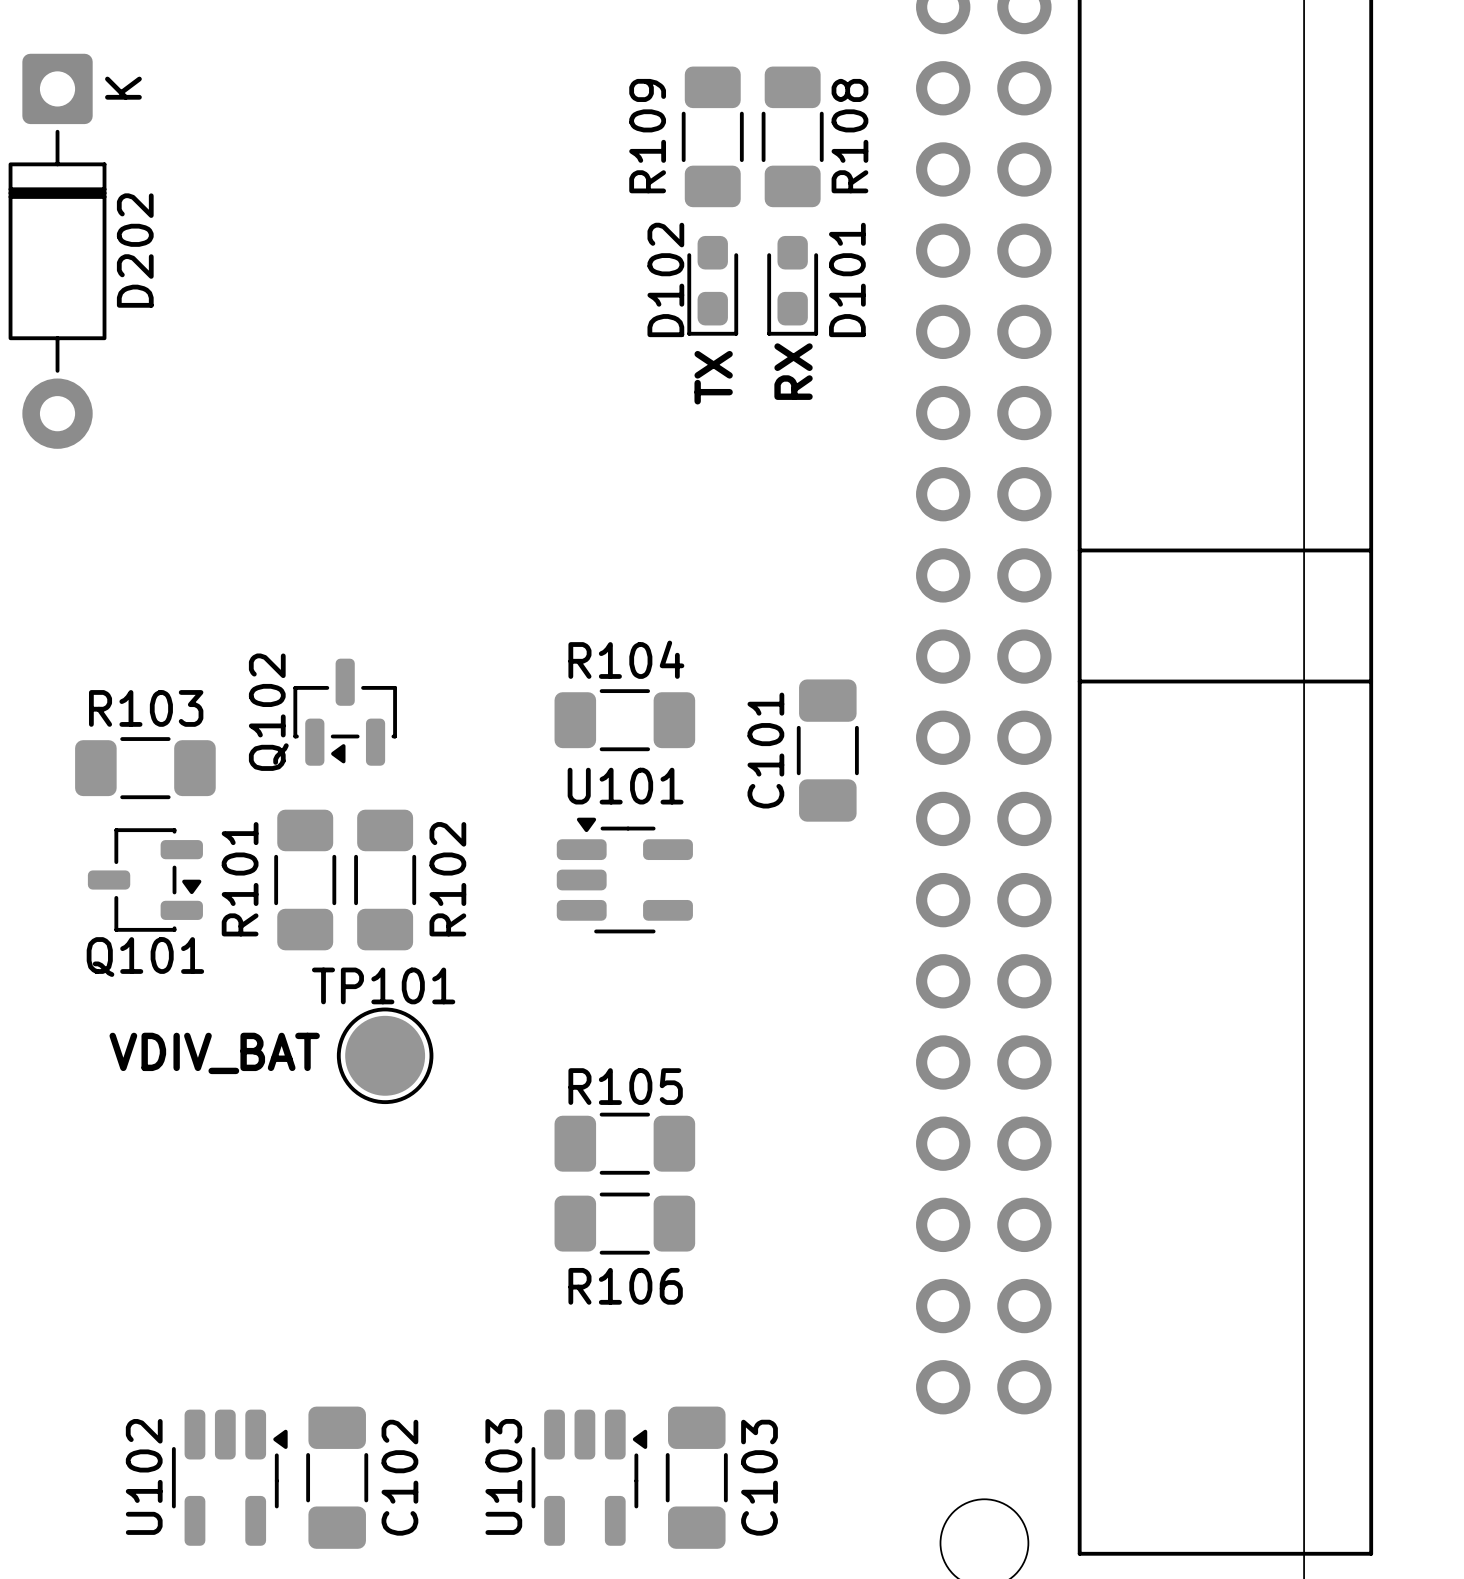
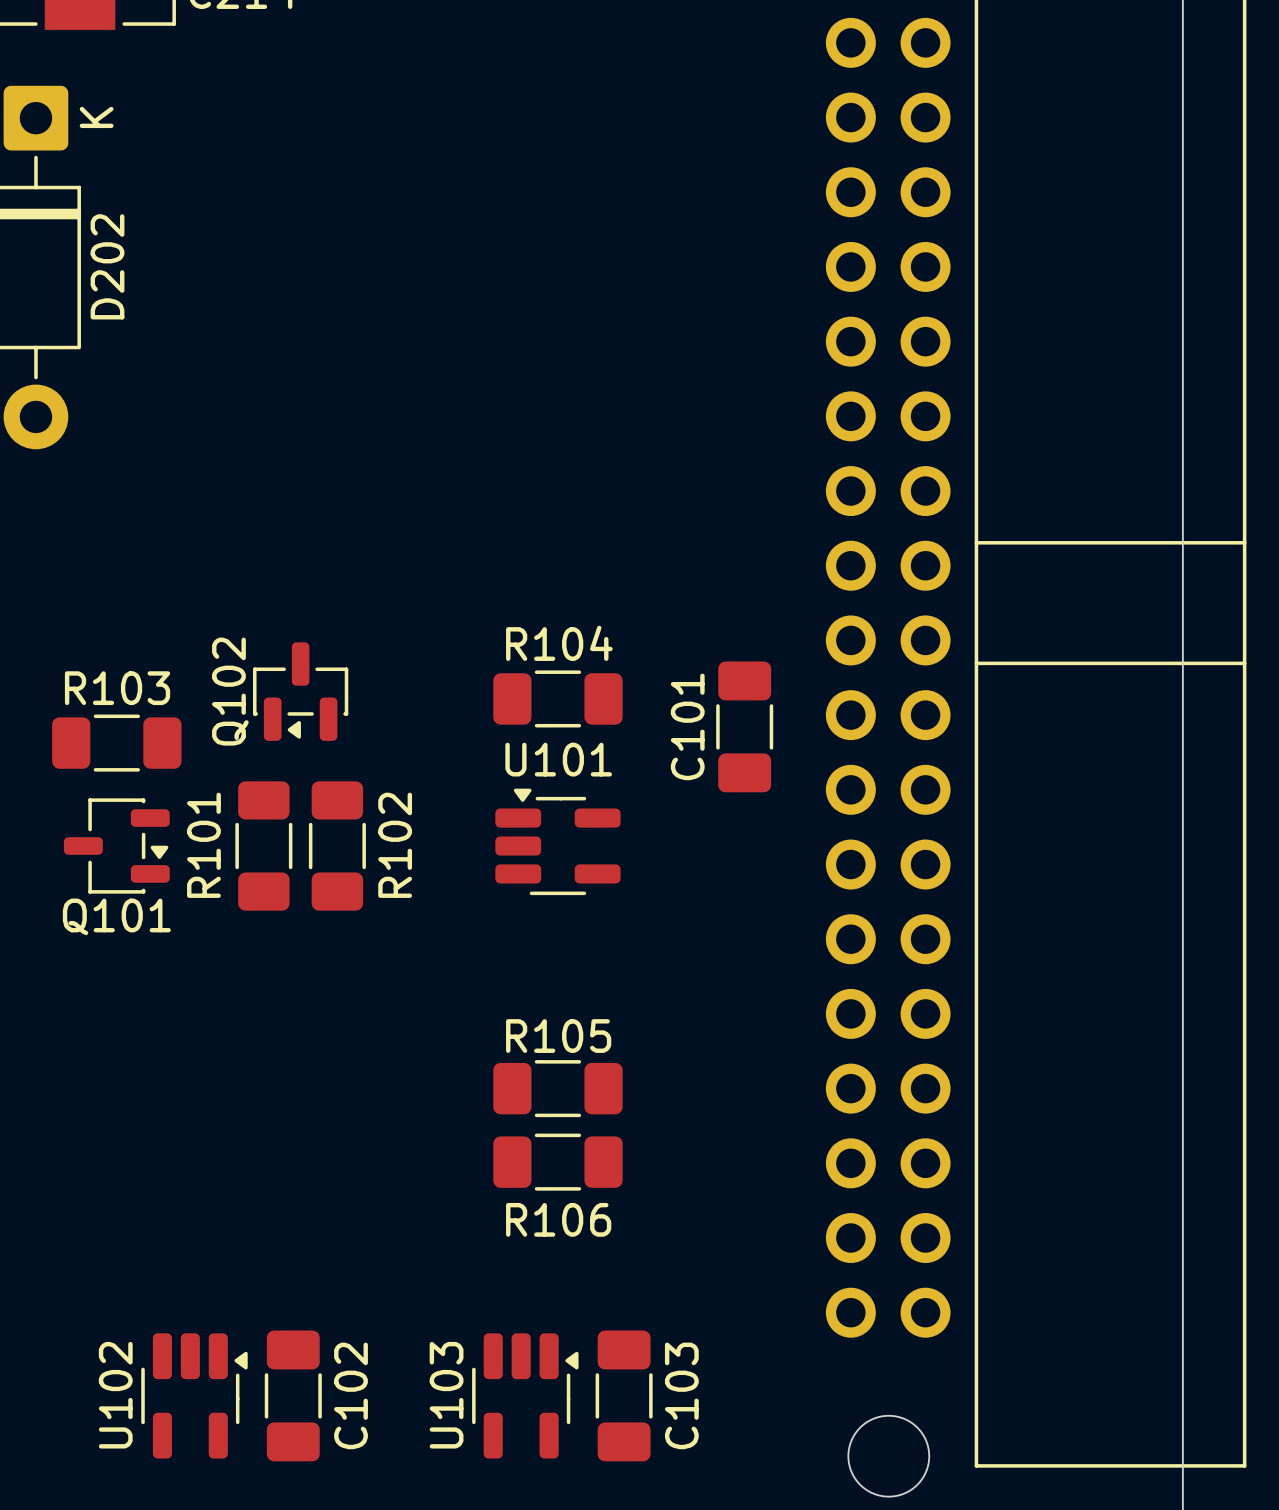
R109: (712, 136) -> none
R108: (792, 136) -> none
D102: (712, 285) -> none
D101: (792, 285) -> none
text: RX (793, 371) -> none
text: TX (713, 377) -> none
text: VDIV_BAT (214, 1053) -> none
TP101: (385, 1055) -> none

